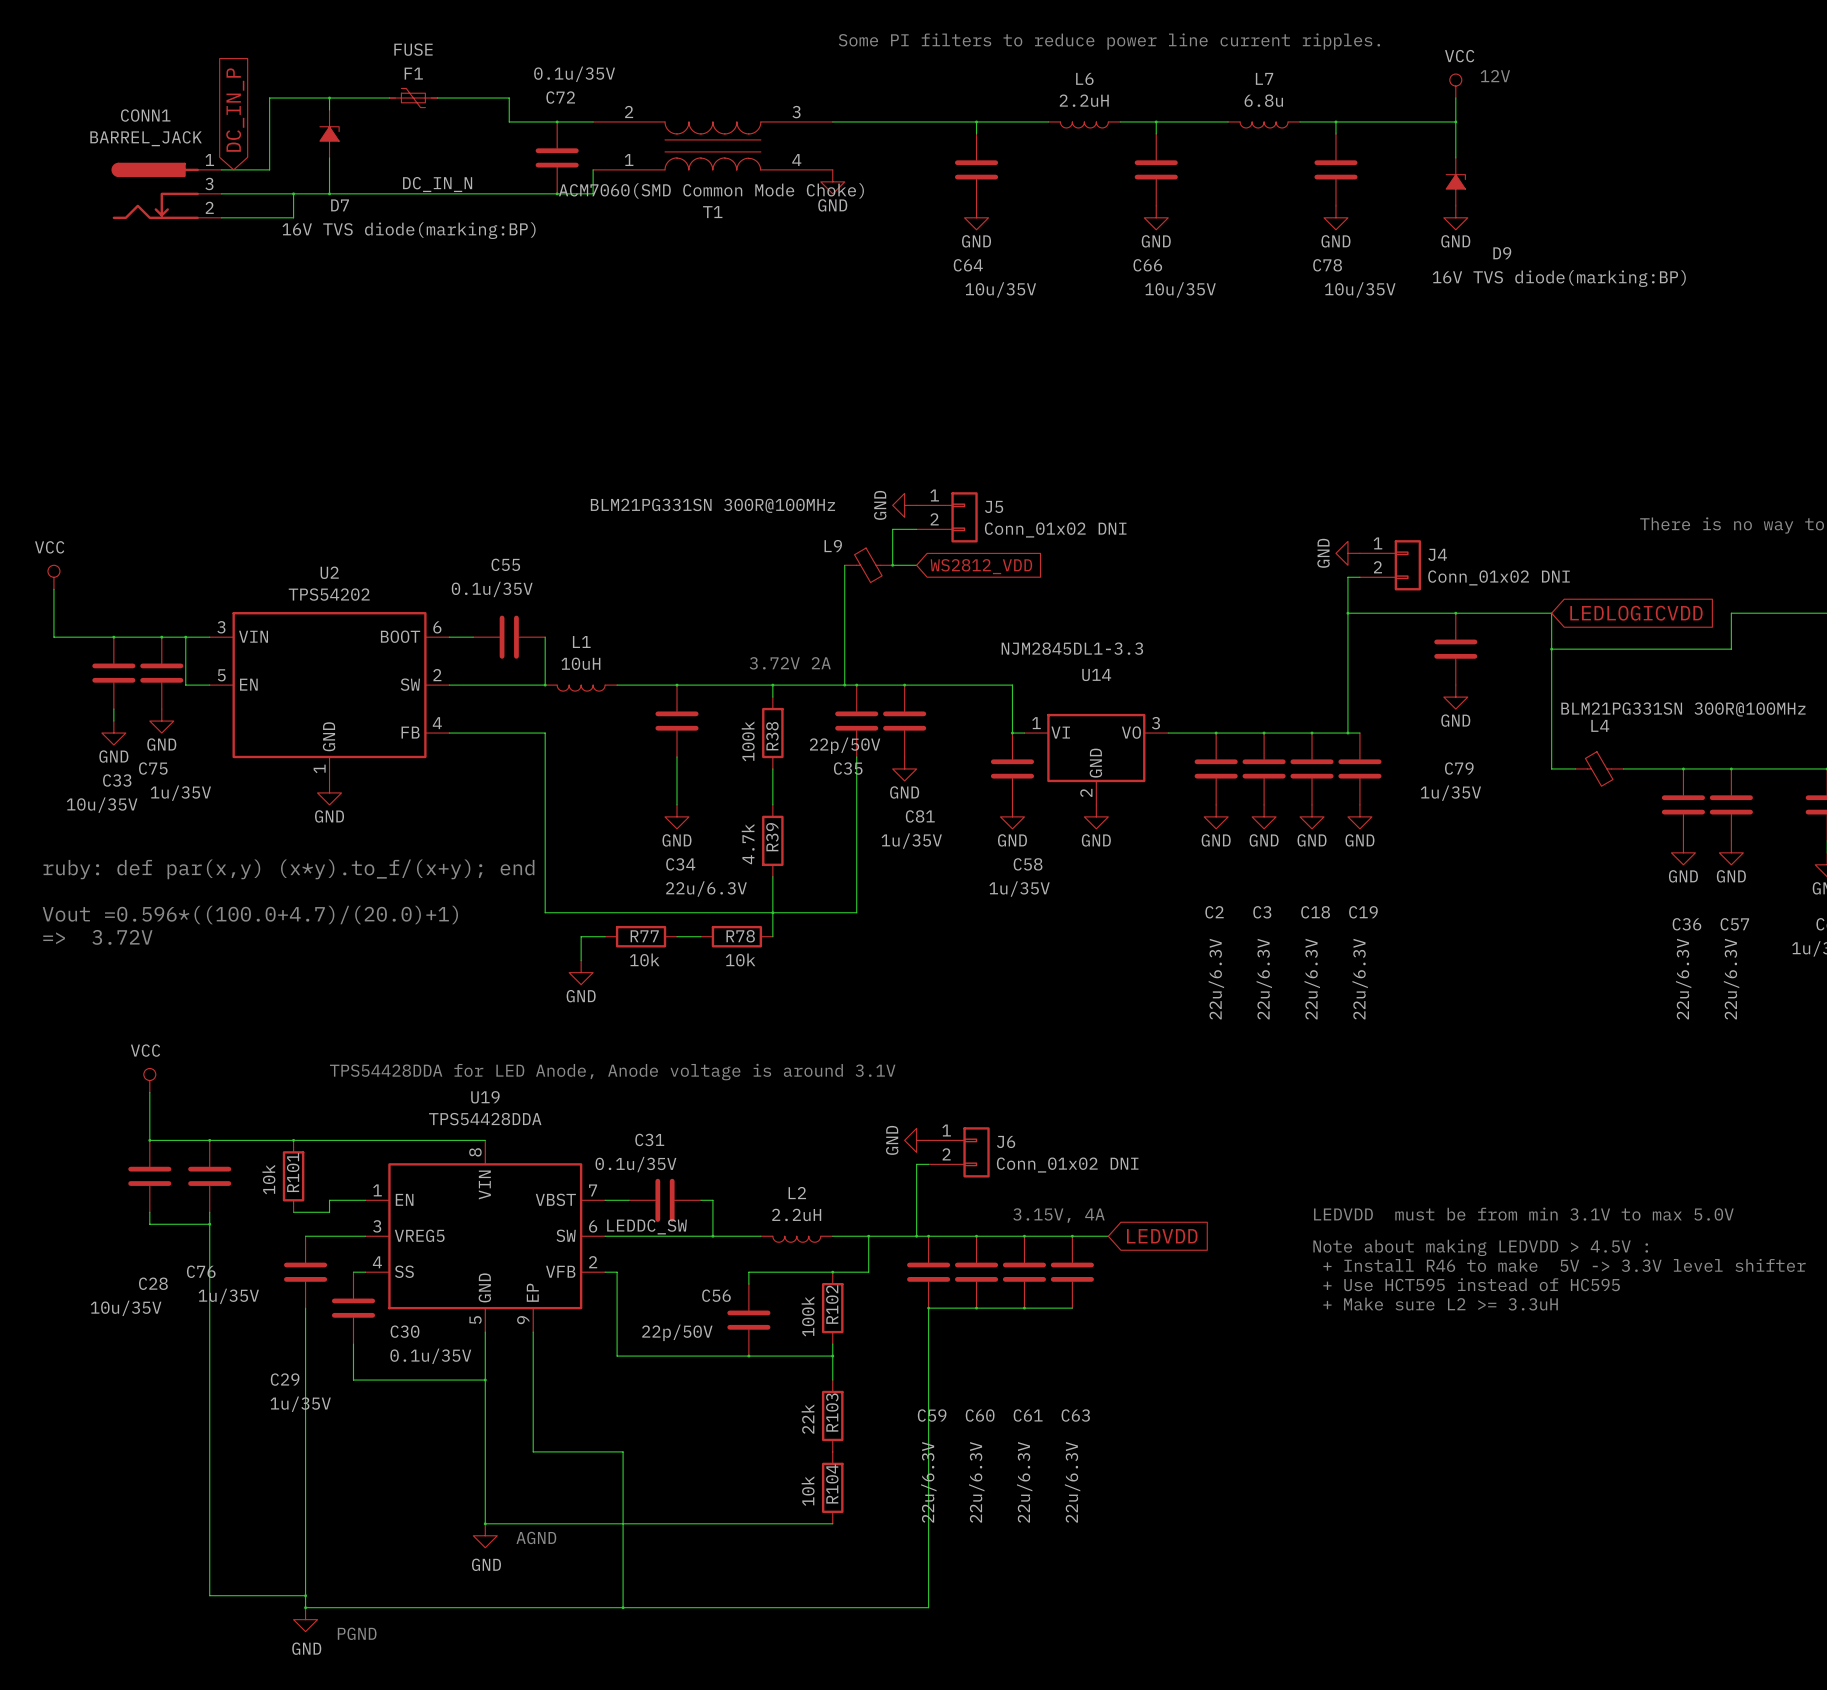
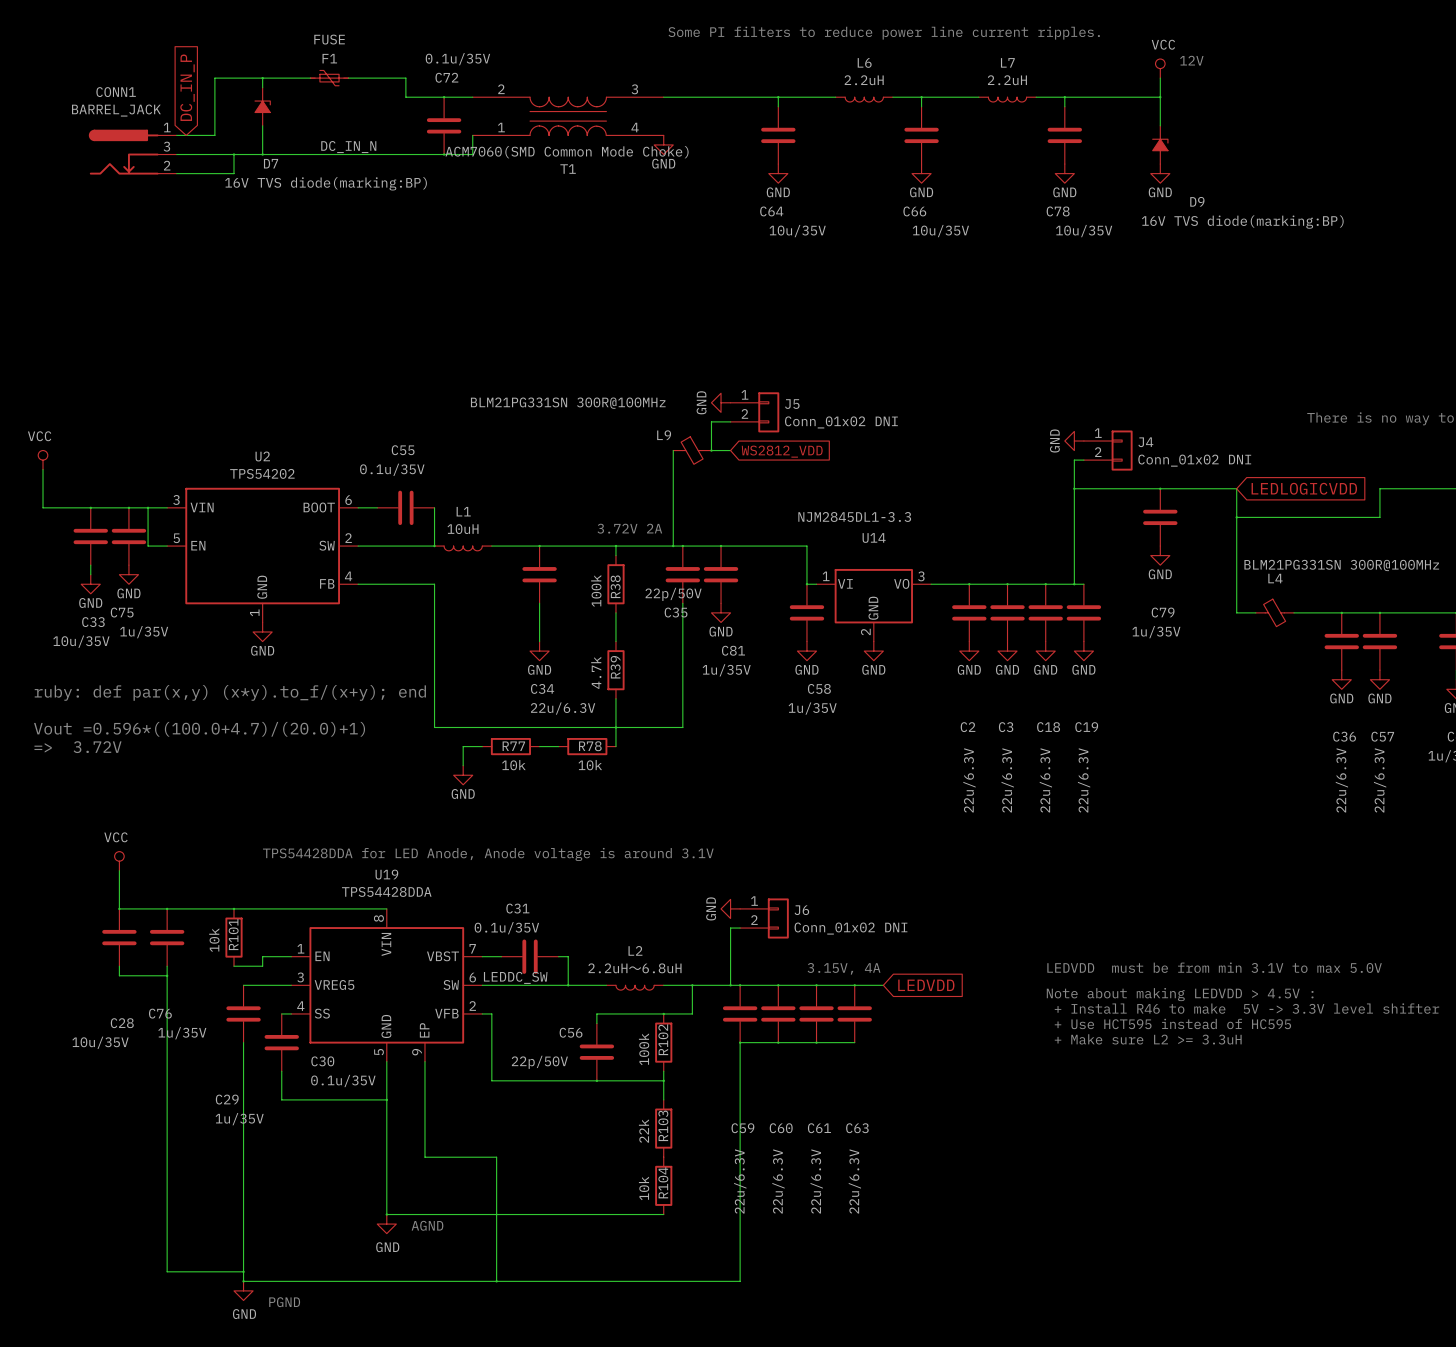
L7 value: 6.8u (1263, 100) -> 2.2uH (1007, 80)
L2 value: 2.2uH (796, 1214) -> 2.2uH〜6.8uH (634, 968)

